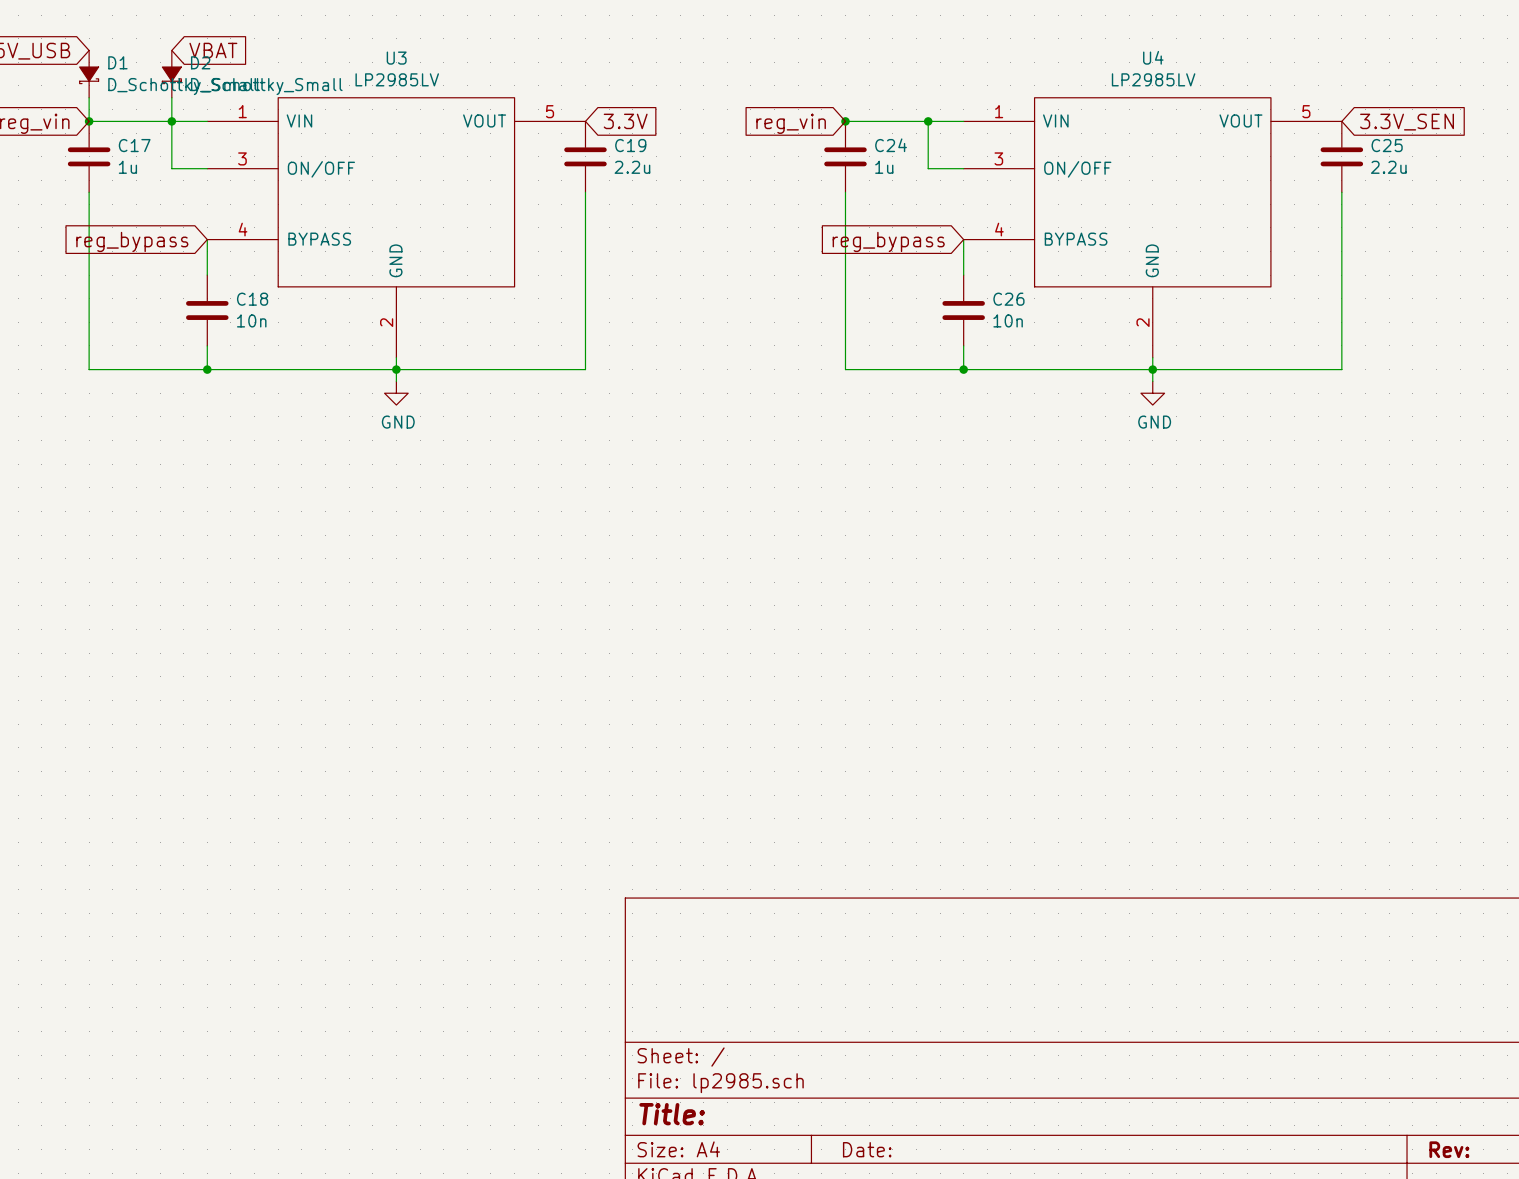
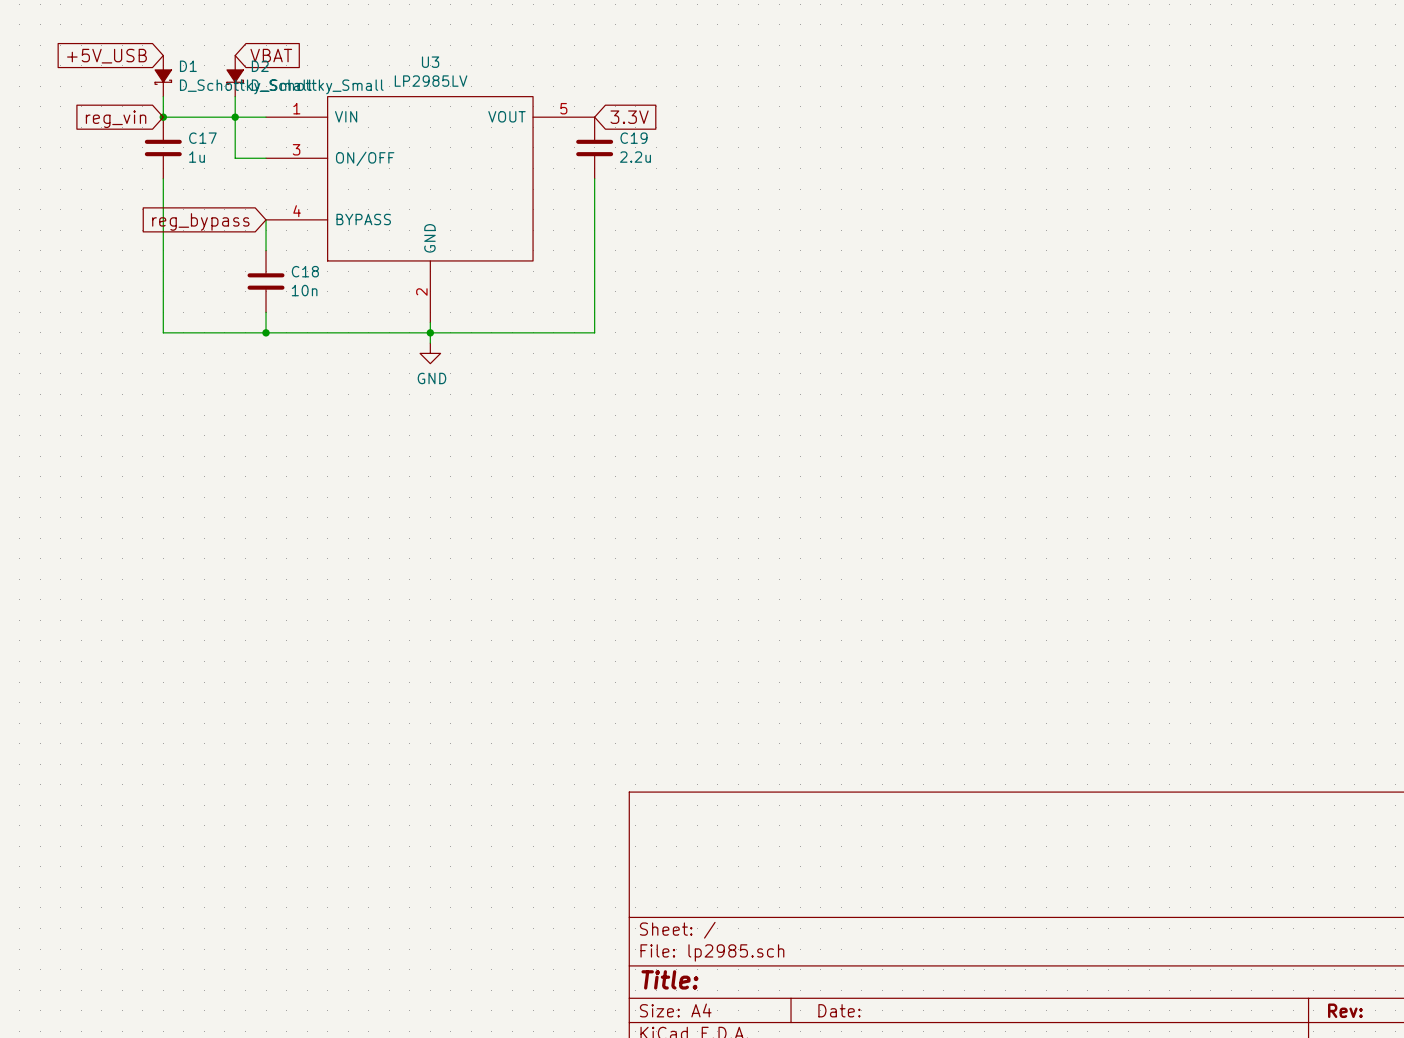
wire: (845, 121) (963, 121) -> none
junction: (845, 121) -> none
wire: (928, 121) (928, 168) (963, 168) -> none
junction: (928, 121) -> none
global label: 3.3V_SEN (1407, 122) -> none
global label: reg_vin (791, 123) -> none
C24: 1u (845, 156) -> none
C25: 2.2u (1341, 156) -> none
wire: (845, 192) (845, 369) (1341, 369) (1341, 192) -> none
U4: LP2985LV (1152, 227) -> none
wire: (963, 239) (963, 275) -> none
global label: reg_bypass (888, 241) -> none
C26: 10n (963, 310) -> none
wire: (963, 345) (963, 369) -> none
wire: (1152, 357) (1152, 381) -> none
junction: (963, 369) -> none
junction: (1152, 369) -> none
power symbol: GND (1152, 393) -> none

